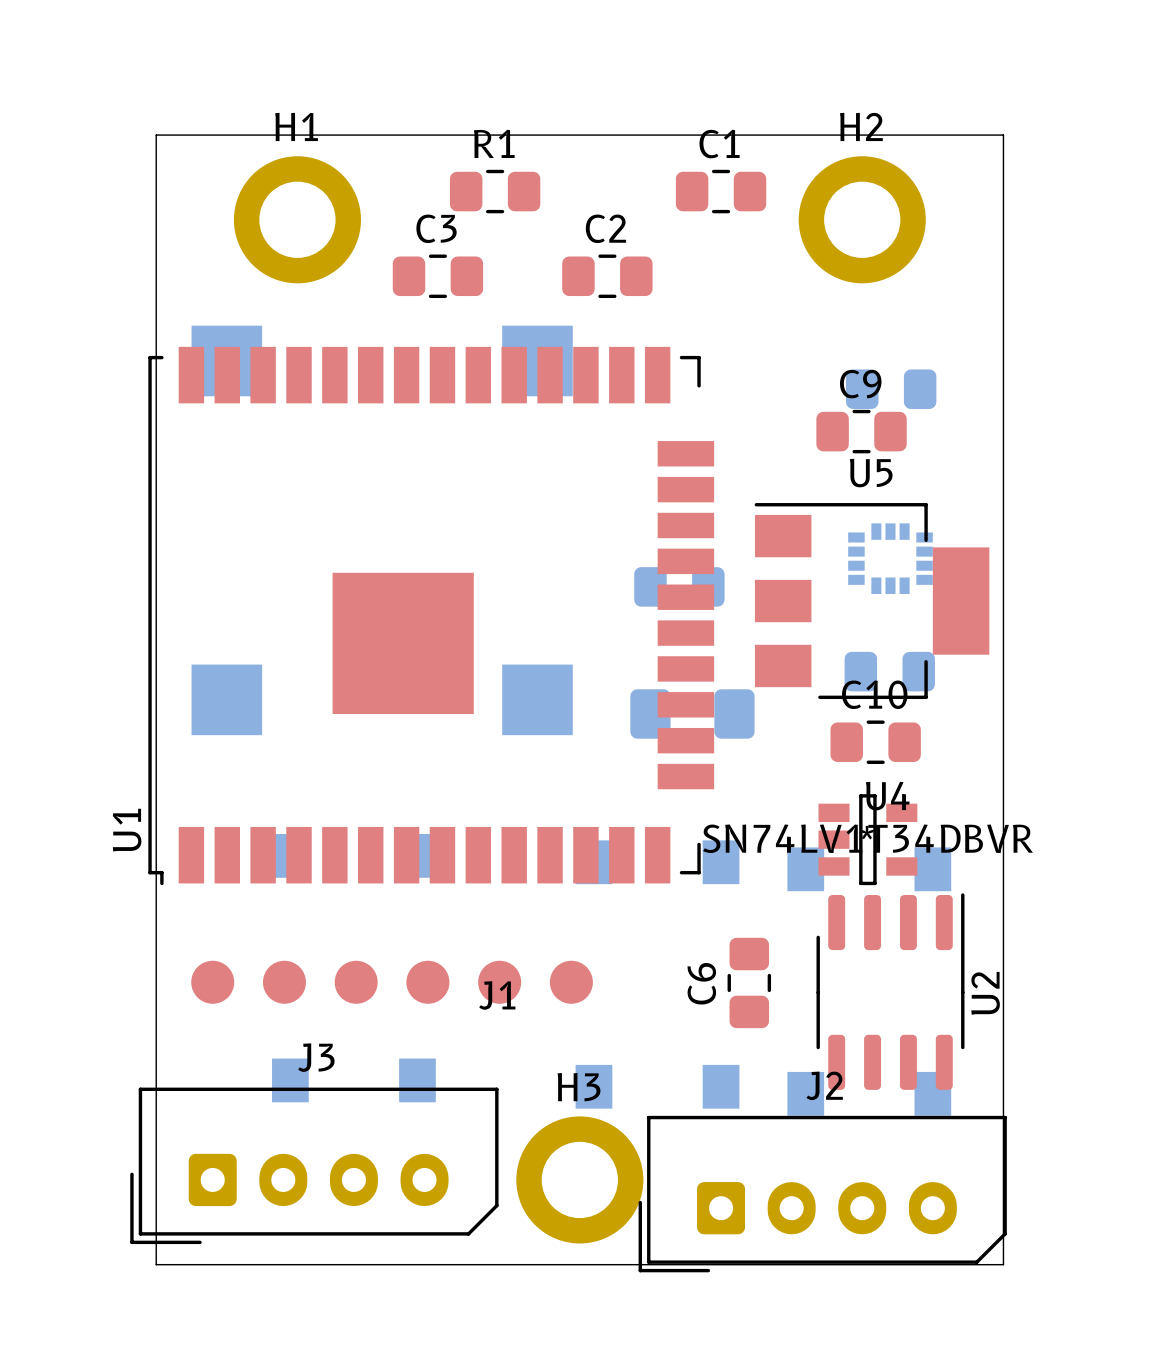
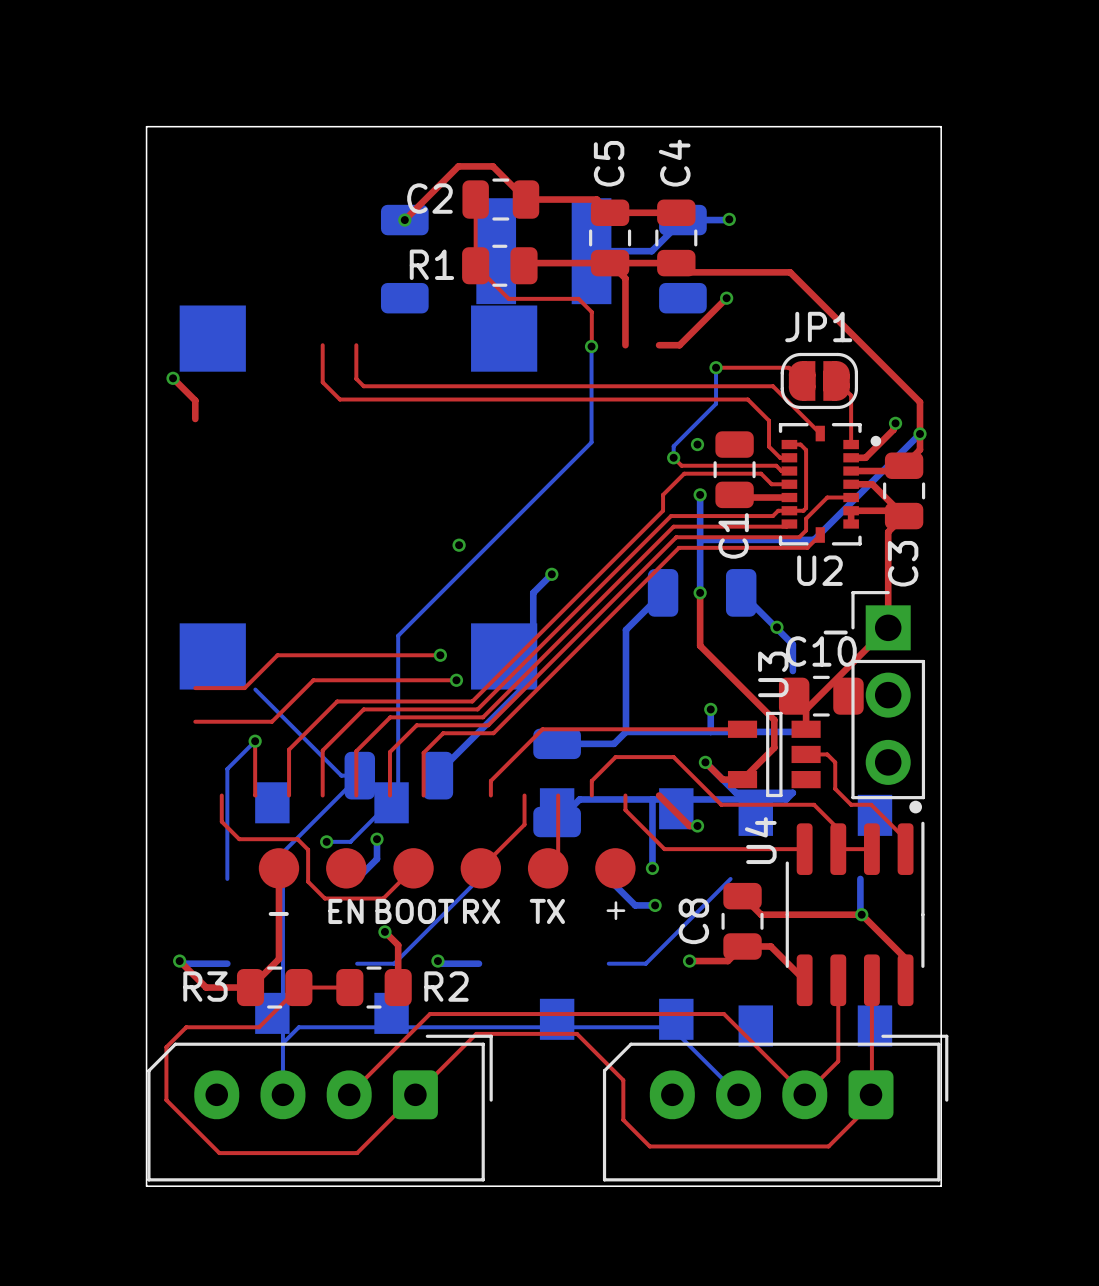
R1 name position: R1 (494, 143) -> R1 (431, 264)
C1 name position: C1 (719, 144) -> C1 (733, 535)
R1 footprint: [449, 169, 541, 214] -> [462, 244, 538, 287]
C1 footprint: [675, 169, 767, 214] -> [713, 431, 756, 509]
top track: none -> (475, 199) (475, 265) (508, 298) (578, 298) (591, 312) (591, 345)
H1: (297, 219) -> none
H2: (862, 219) -> none
top track: none -> (676, 212) (610, 212) (596, 199) (525, 199) (492, 166) (458, 166) (404, 220)
C3 name position: C3 (436, 228) -> C3 (903, 563)
C2 name position: C2 (605, 228) -> C2 (429, 198)
bottom track: none -> (729, 219) (682, 220) (651, 251) (591, 251)
via: none -> (729, 219)
via: none -> (404, 220)
C5: none -> (610, 237)
C4: none -> (676, 237)
C3 footprint: [392, 254, 484, 299] -> [883, 452, 926, 530]
C2 footprint: [562, 254, 653, 299] -> [462, 178, 540, 221]
part: none -> (543, 251)
part: none -> (404, 259)
part: none -> (682, 259)
top track: none -> (610, 263) (625, 278) (625, 345)
top track: none -> (524, 265) (526, 263) (676, 263) (685, 272) (790, 272) (920, 402) (920, 449) (898, 471) (851, 471)
top track: none -> (726, 298) (679, 345) (659, 345)
via: none -> (726, 298)
top track: none -> (322, 345) (322, 382) (339, 399) (747, 399) (769, 420) (769, 446) (780, 457) (789, 457)
top track: none -> (356, 345) (356, 378) (363, 386) (772, 386) (820, 433)
bottom track: none -> (591, 346) (591, 442) (398, 635) (398, 794) (350, 841) (326, 841)
via: none -> (591, 346)
part: (891, 389) -> none
top track: none -> (716, 367) (788, 367) (802, 380)
bottom track: none -> (716, 367) (716, 403) (673, 446) (673, 457)
via: none -> (716, 367)
top track: none -> (173, 378) (195, 400) (195, 418)
via: none -> (173, 378)
JP1: none -> (819, 380)
top track: none -> (836, 380) (851, 395) (851, 444)
C9: (861, 431) -> none
top track: none -> (895, 423) (893, 423) (893, 429) (865, 457) (851, 457)
via: none -> (895, 423)
bottom track: none -> (920, 433) (814, 539) (700, 539)
via: none -> (920, 433)
via: none -> (697, 444)
top track: none -> (789, 444) (800, 444) (806, 450) (806, 508) (803, 510) (778, 510) (772, 516) (671, 516) (477, 709) (363, 709) (322, 750) (322, 795)
top track: none -> (673, 457) (681, 465) (776, 465) (781, 471) (789, 471)
via: none -> (673, 457)
top track: none -> (789, 484) (771, 484) (761, 473) (684, 473) (663, 494) (663, 510) (472, 701) (337, 701) (289, 749) (289, 795)
top track: none -> (851, 484) (872, 484) (904, 516) (888, 531) (888, 627)
bottom track: none -> (700, 494) (700, 592)
via: none -> (700, 494)
top track: none -> (737, 497) (789, 497)
top track: none -> (851, 497) (827, 497) (806, 518) (806, 530) (799, 537) (676, 537) (488, 725) (416, 725) (389, 752) (389, 795)
top track: none -> (898, 510) (851, 510) (851, 524)
top track: none -> (789, 524) (786, 526) (673, 526) (482, 717) (390, 717) (356, 751) (356, 795)
part: (890, 558) -> none
top track: none -> (820, 535) (807, 547) (678, 547) (493, 733) (443, 733) (423, 752) (423, 795)
via: none -> (459, 545)
part: (679, 586) -> none
U5: (871, 601) -> none
bottom track: none -> (551, 574) (533, 592) (533, 677) (437, 772) (437, 775)
via: none -> (551, 574)
U1: (431, 616) -> none
bottom track: none -> (663, 592) (625, 629) (625, 731)
top track: none -> (700, 592) (700, 645) (774, 720) (774, 747) (742, 779) (722, 779) (705, 762)
via: none -> (700, 592)
part: none -> (702, 592)
bottom track: none -> (741, 592) (792, 644) (792, 671)
via: none -> (776, 627)
top track: none -> (887, 627) (806, 709) (806, 729)
part: (889, 671) -> none
text: none -> - (835, 632)
top track: none -> (440, 655) (277, 655) (244, 688) (195, 688)
via: none -> (440, 655)
part: (692, 713) -> none
top track: none -> (456, 680) (313, 680) (271, 721) (195, 721)
via: none -> (456, 680)
bottom track: none -> (255, 689) (341, 775) (359, 775) (282, 852) (282, 1094)
part: none -> (888, 695)
bottom track: none -> (710, 709) (710, 731)
via: none -> (710, 709)
top track: none -> (742, 729) (542, 729) (490, 780) (490, 795)
bottom track: none -> (625, 731) (792, 731)
bottom track: none -> (625, 731) (614, 743) (557, 743)
top track: none -> (255, 741) (255, 795)
bottom track: none -> (255, 741) (227, 769) (227, 878)
via: none -> (255, 741)
U4 footprint: [818, 794, 918, 886] -> [785, 800, 925, 1007]
U4 name position: U4 (887, 796) -> U4 (760, 840)
U3: none -> (774, 754)
top track: none -> (806, 754) (827, 754) (835, 762) (835, 788) (851, 804) (871, 804) (905, 839) (905, 849)
bottom track: none -> (705, 762) (735, 792) (792, 792) (786, 799) (579, 799) (557, 821)
via: none -> (705, 762)
part: none -> (398, 775)
part: none -> (557, 782)
U4 value: SN74LV1T34DBVR (868, 838) -> none
top track: none -> (221, 795) (221, 821) (239, 839) (297, 839) (308, 849) (308, 881) (324, 898) (383, 898) (413, 868)
top track: none -> (524, 795) (524, 824) (480, 868)
top track: none -> (558, 795) (558, 858) (548, 868)
top track: none -> (591, 795) (591, 780) (615, 757) (673, 757) (721, 804) (814, 804) (838, 829) (838, 849) (871, 849)
top track: none -> (625, 795) (625, 810) (664, 849) (804, 849)
top track: none -> (659, 795) (689, 825) (697, 825)
bottom track: none -> (652, 799) (652, 868)
via: none -> (697, 825)
U2 footprint: [816, 893, 965, 1090] -> [778, 422, 882, 546]
bottom track: none -> (377, 839) (377, 859) (357, 878)
via: none -> (377, 839)
via: none -> (326, 841)
top track: none -> (278, 868) (278, 959) (250, 987) (206, 987) (179, 961)
part: none -> (447, 868)
via: none -> (652, 868)
bottom track: none -> (478, 878) (394, 963) (357, 963)
bottom track: none -> (608, 878) (635, 905) (655, 905)
bottom track: none -> (730, 878) (645, 963) (608, 963)
bottom track: none -> (860, 878) (861, 914)
top track: none -> (742, 896) (761, 914) (861, 914) (905, 958) (905, 980)
via: none -> (655, 905)
text: none -> + (615, 910)
text: none -> EN (346, 911)
text: none -> BOOT (414, 911)
text: none -> RX (481, 911)
text: none -> TX (547, 911)
text: none -> - (278, 913)
via: none -> (861, 914)
J1: (392, 982) -> none
C6: (749, 982) -> none
C8: none -> (742, 921)
top track: none -> (384, 931) (398, 945) (398, 987)
via: none -> (384, 931)
U2 name position: U2 (985, 993) -> U2 (819, 570)
bottom track: none -> (179, 961) (182, 963) (227, 963)
via: none -> (179, 961)
bottom track: none -> (437, 961) (440, 963) (478, 963)
via: none -> (437, 961)
top track: none -> (689, 961) (727, 961) (742, 946) (770, 946) (804, 980)
via: none -> (689, 961)
top track: none -> (838, 980) (838, 1061) (804, 1094) (723, 1014) (429, 1014) (349, 1094)
top track: none -> (871, 980) (870, 1104) (828, 1146) (649, 1146) (623, 1119) (623, 1080) (576, 1033) (476, 1033) (357, 1153) (219, 1153) (166, 1100) (166, 1047) (186, 1027) (259, 1027) (298, 987) (349, 987)
R3: none -> (274, 987)
R2: none -> (374, 987)
bottom track: none -> (282, 1043) (298, 1027) (671, 1027) (738, 1094)
J3: (314, 1165) -> none
H3: (579, 1179) -> none
part: none -> (320, 1108)
part: none -> (775, 1108)
J2: (822, 1194) -> none

